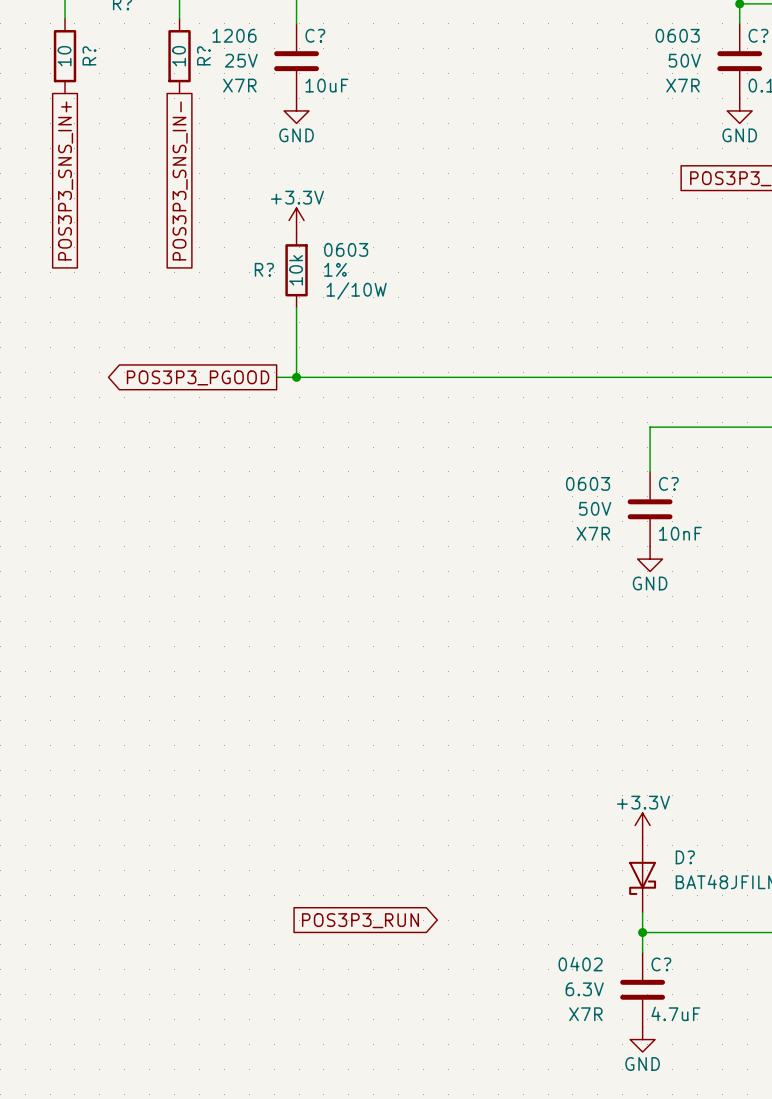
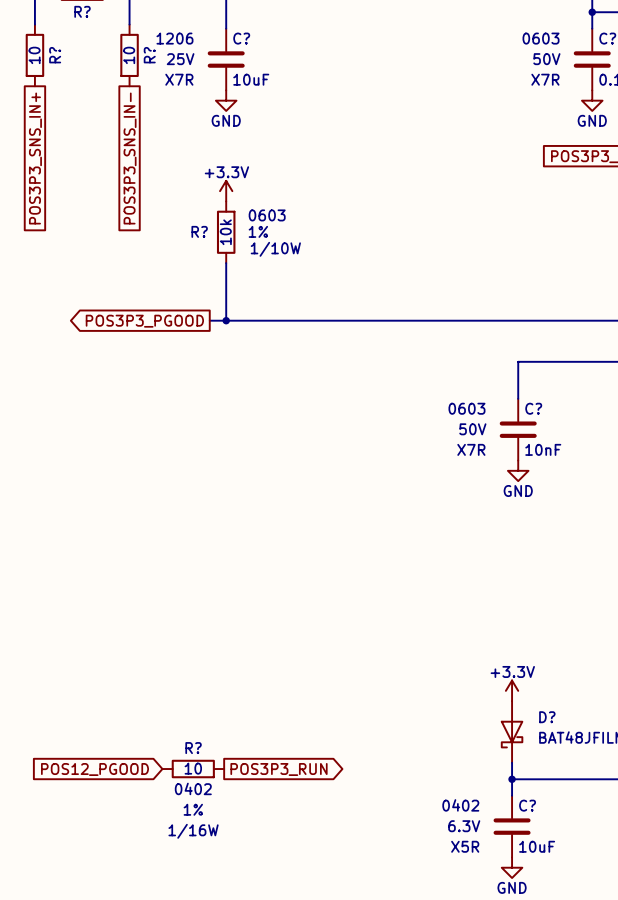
global label: none -> POS12_PGOOD (94, 769)
R?: none -> 10 (193, 769)
C? value: 4.7uF (675, 1013) -> 10uF (537, 846)
C? text: X7R (585, 1014) -> X5R (465, 846)

